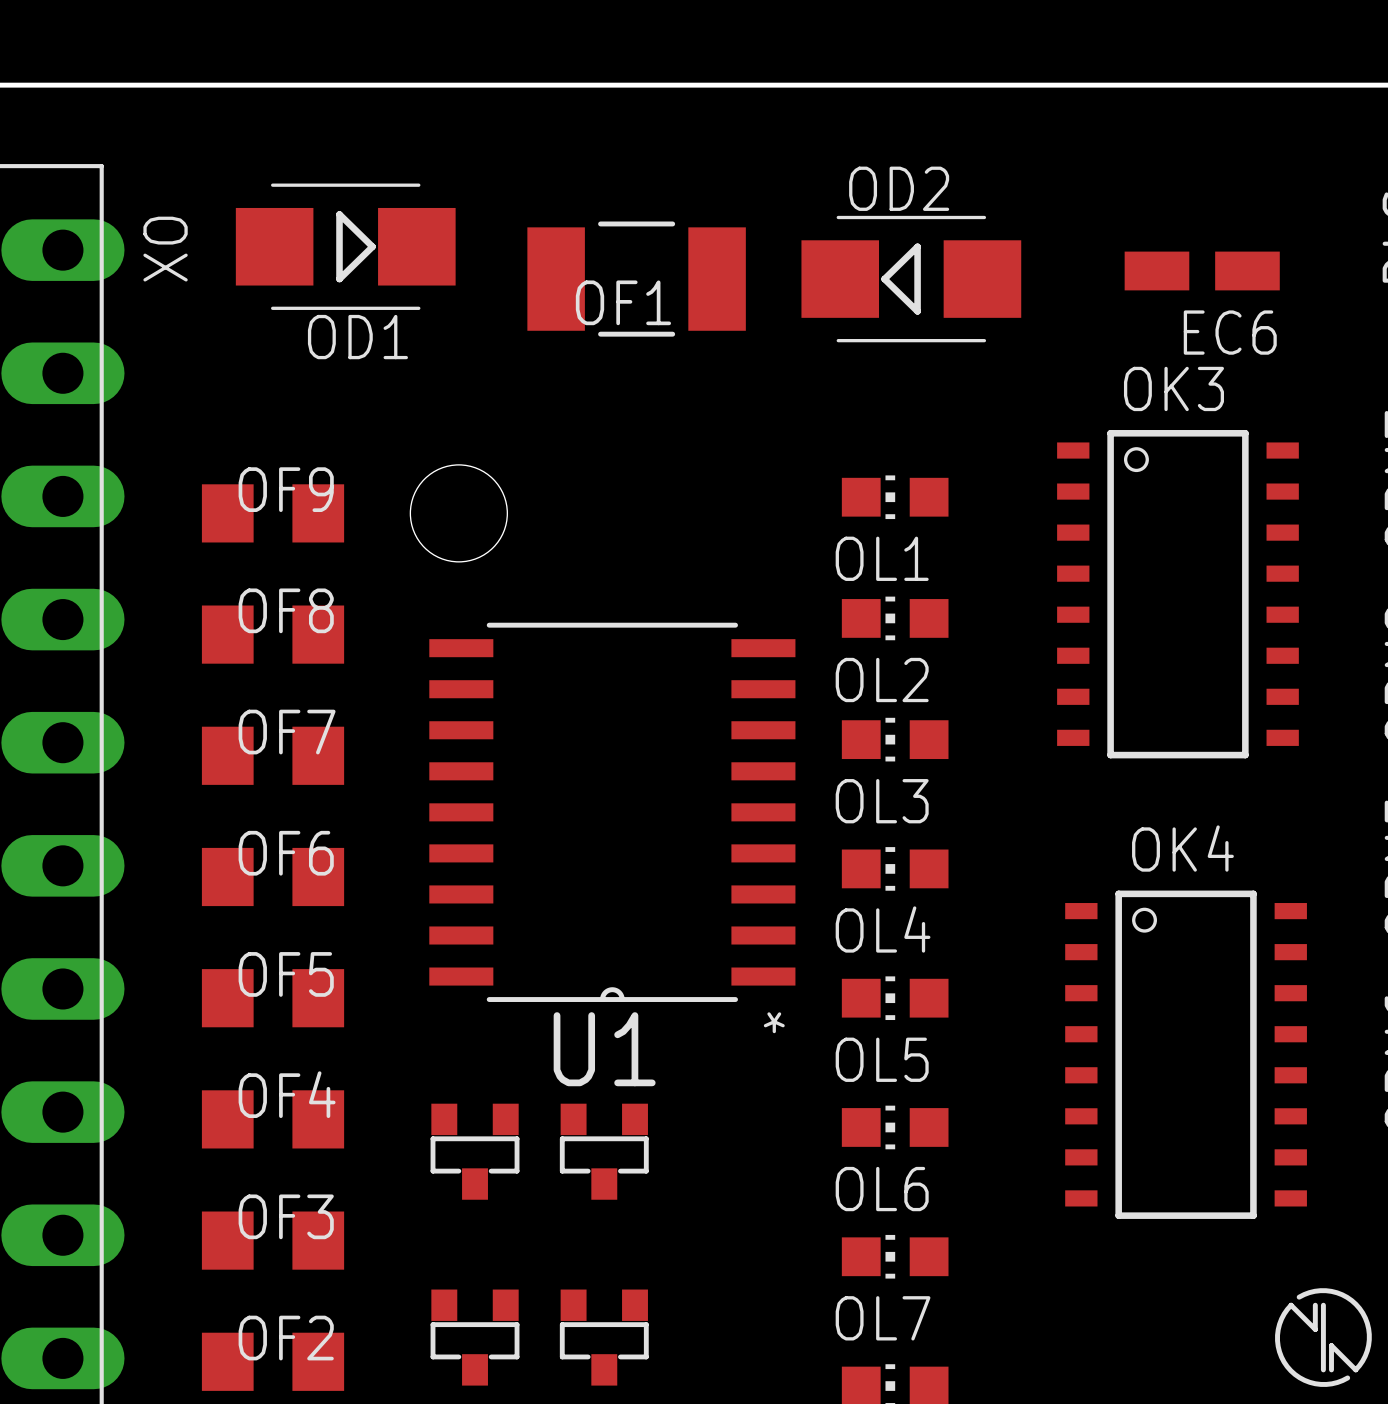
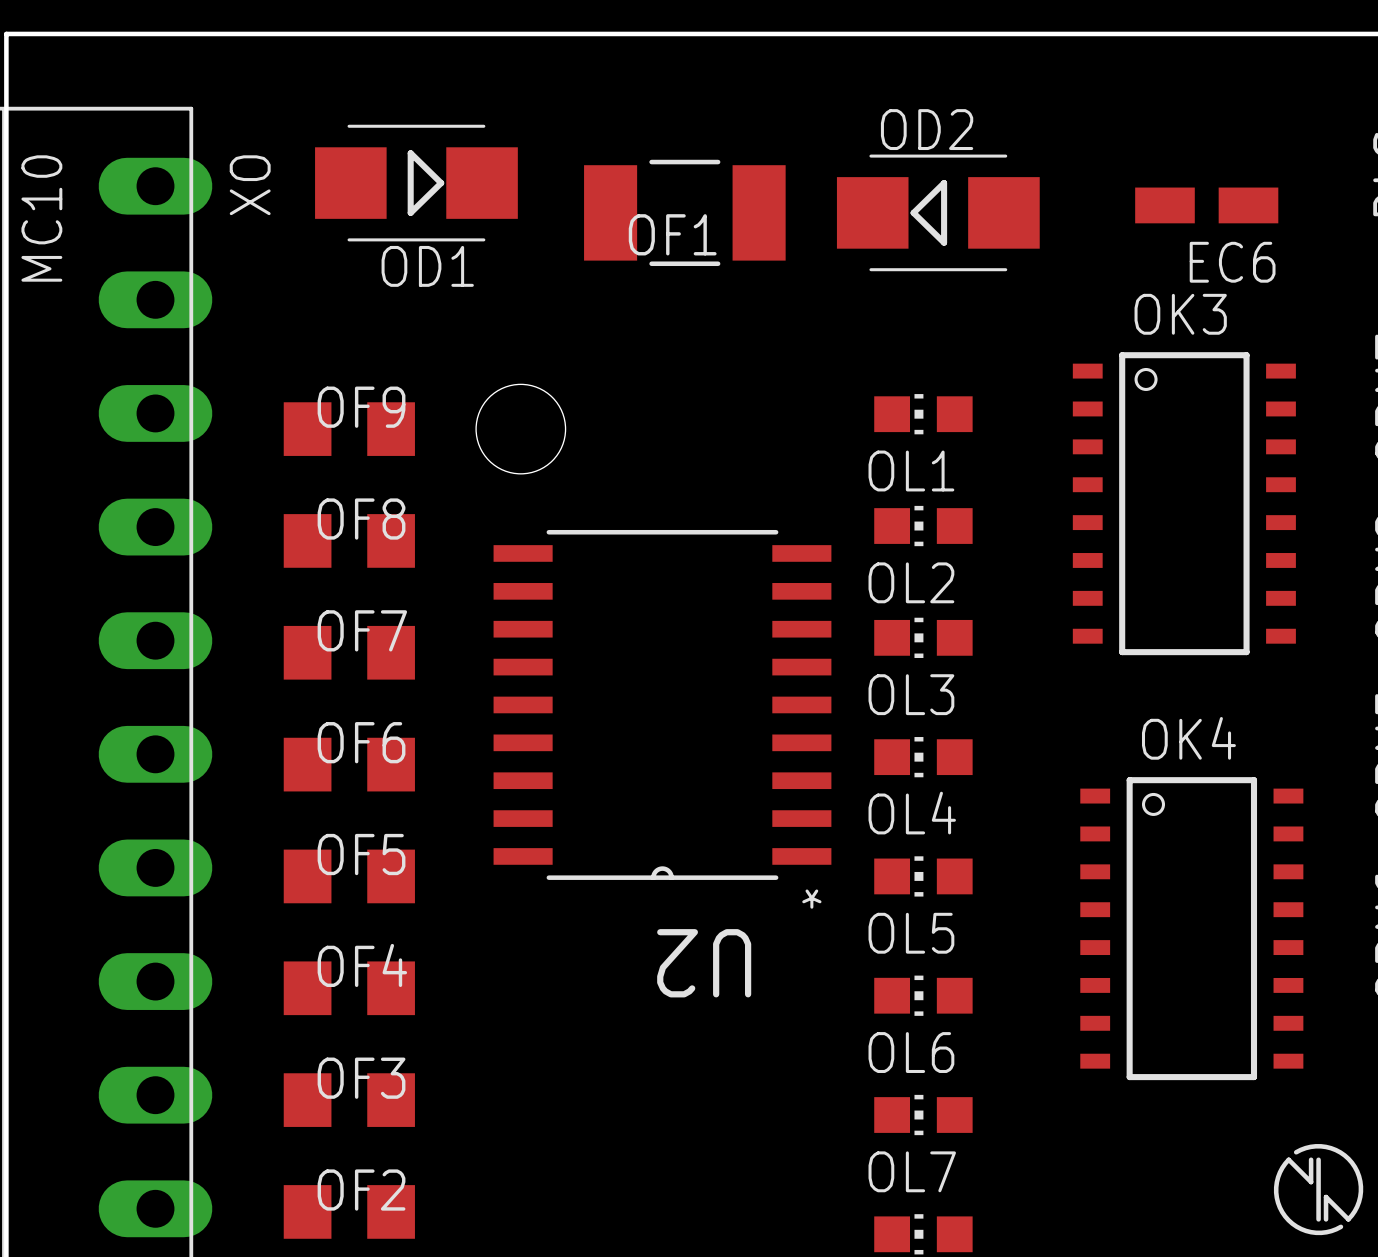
U1 name: U1 (604, 1049) -> U2 (704, 963)
part: (475, 1151) -> none
part: (604, 1151) -> none
part: (475, 1337) -> none
part: (604, 1337) -> none

